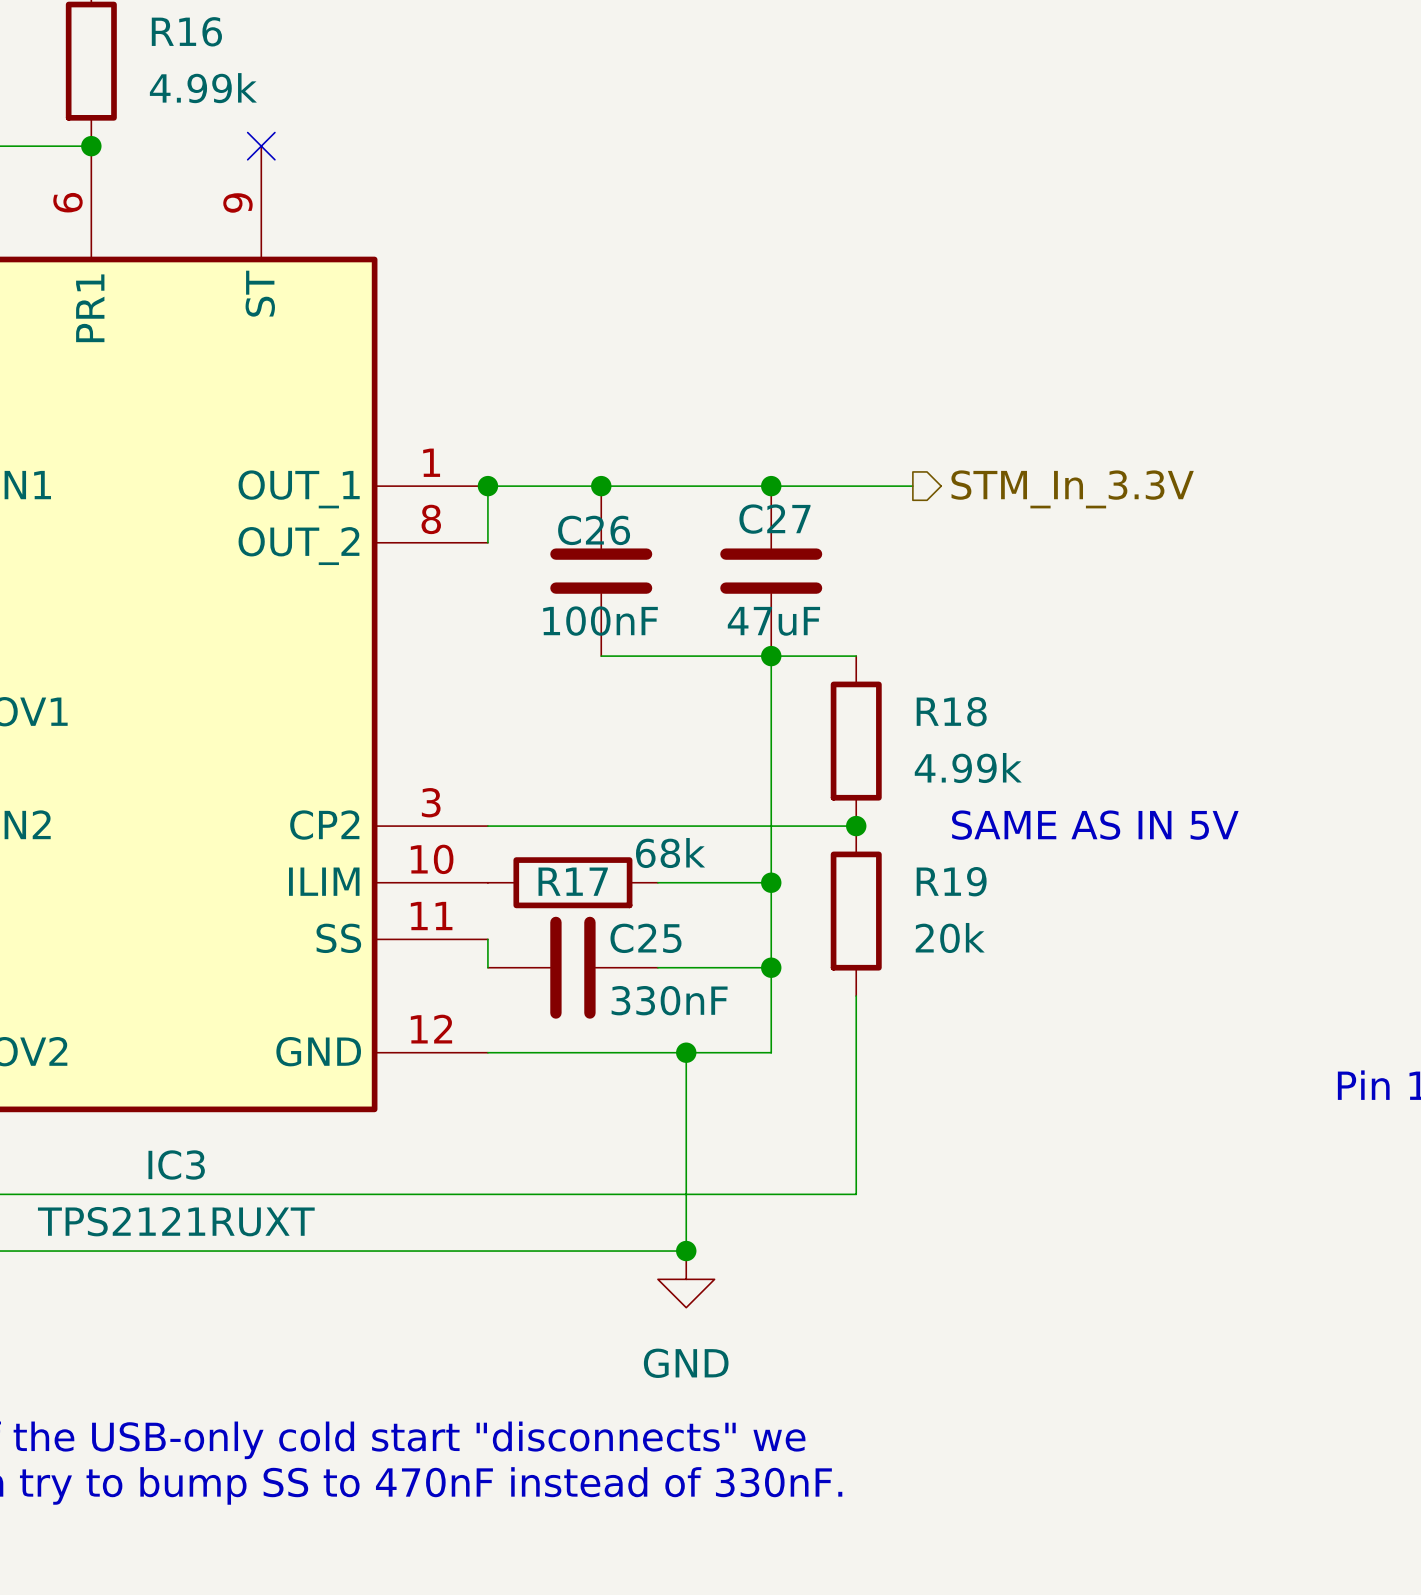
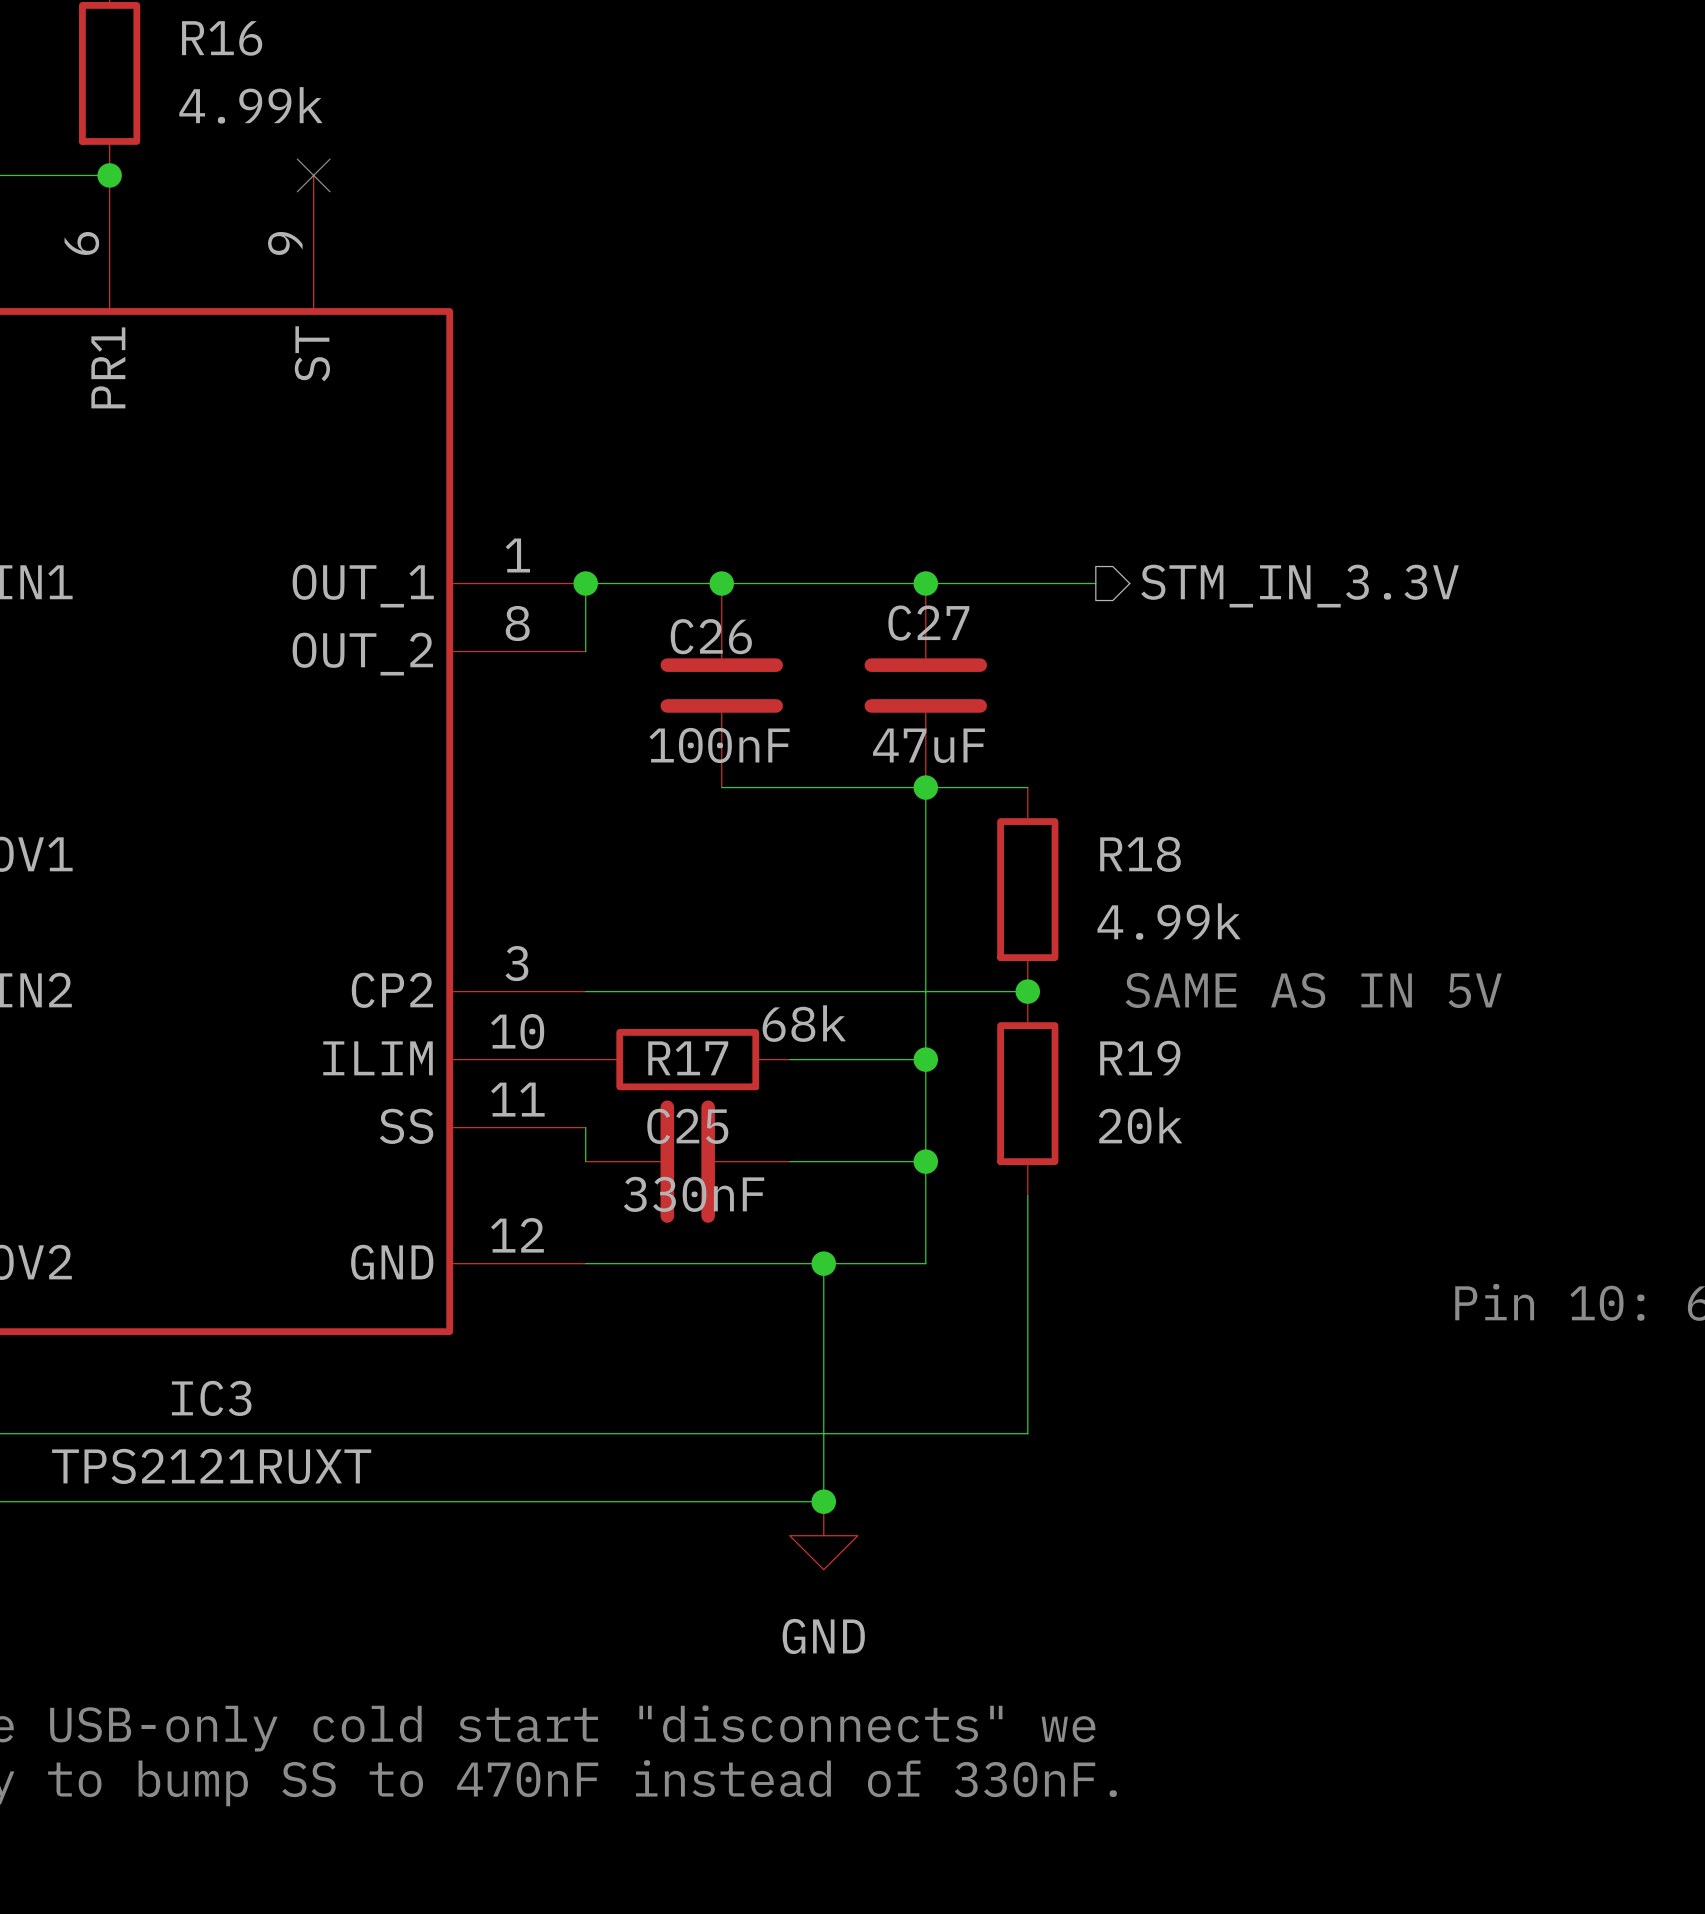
hierarchical label: STM_In_3.3V (1072, 489) -> STM_IN_3.3V (1300, 586)
C25 name position: C25 (645, 938) -> C25 (687, 1126)
C25 value position: 330nF (669, 1000) -> 330nF (694, 1194)

